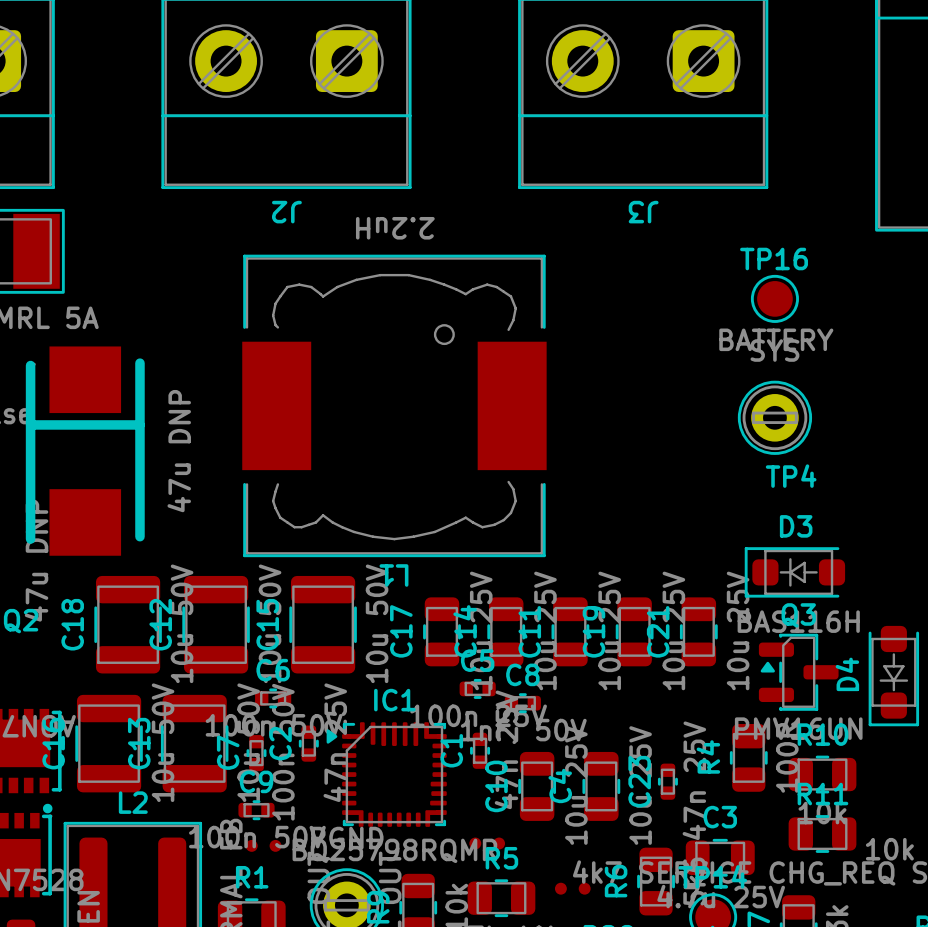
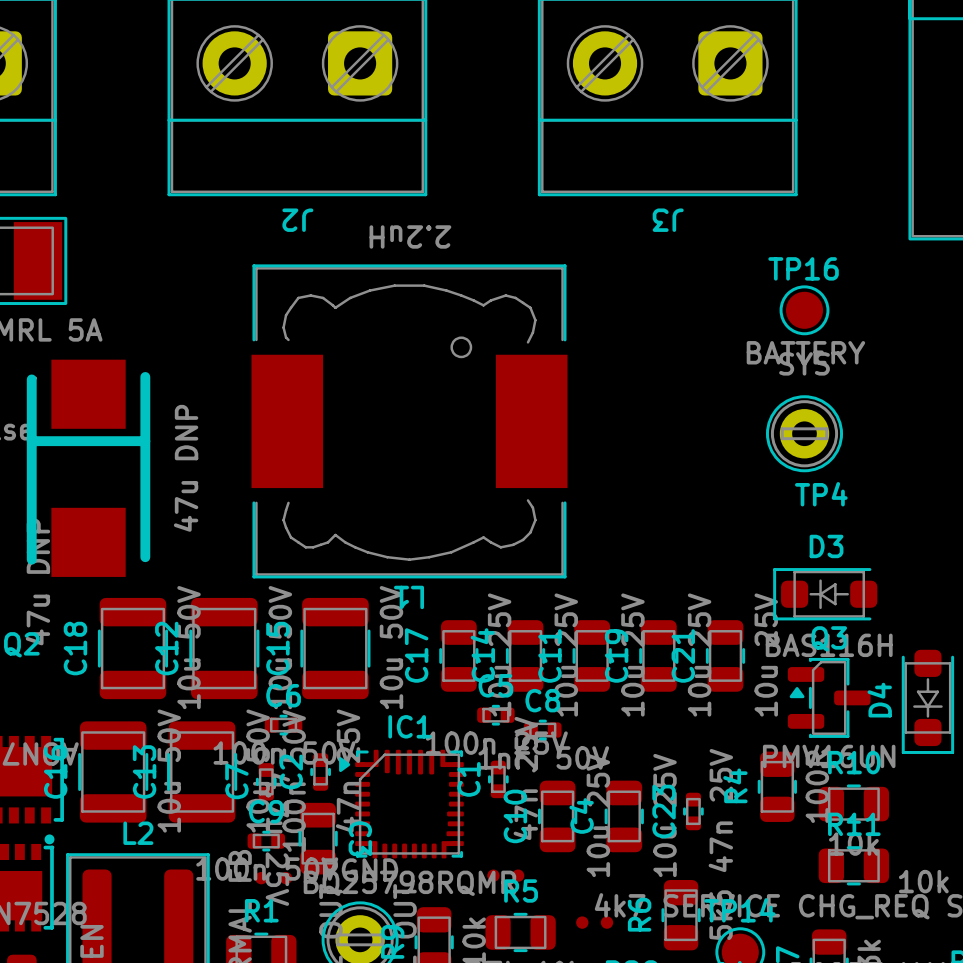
C3 rotation: 0° (720, 857) -> 90° clockwise (318, 838)
C3 position: (720, 857) -> (318, 838)

